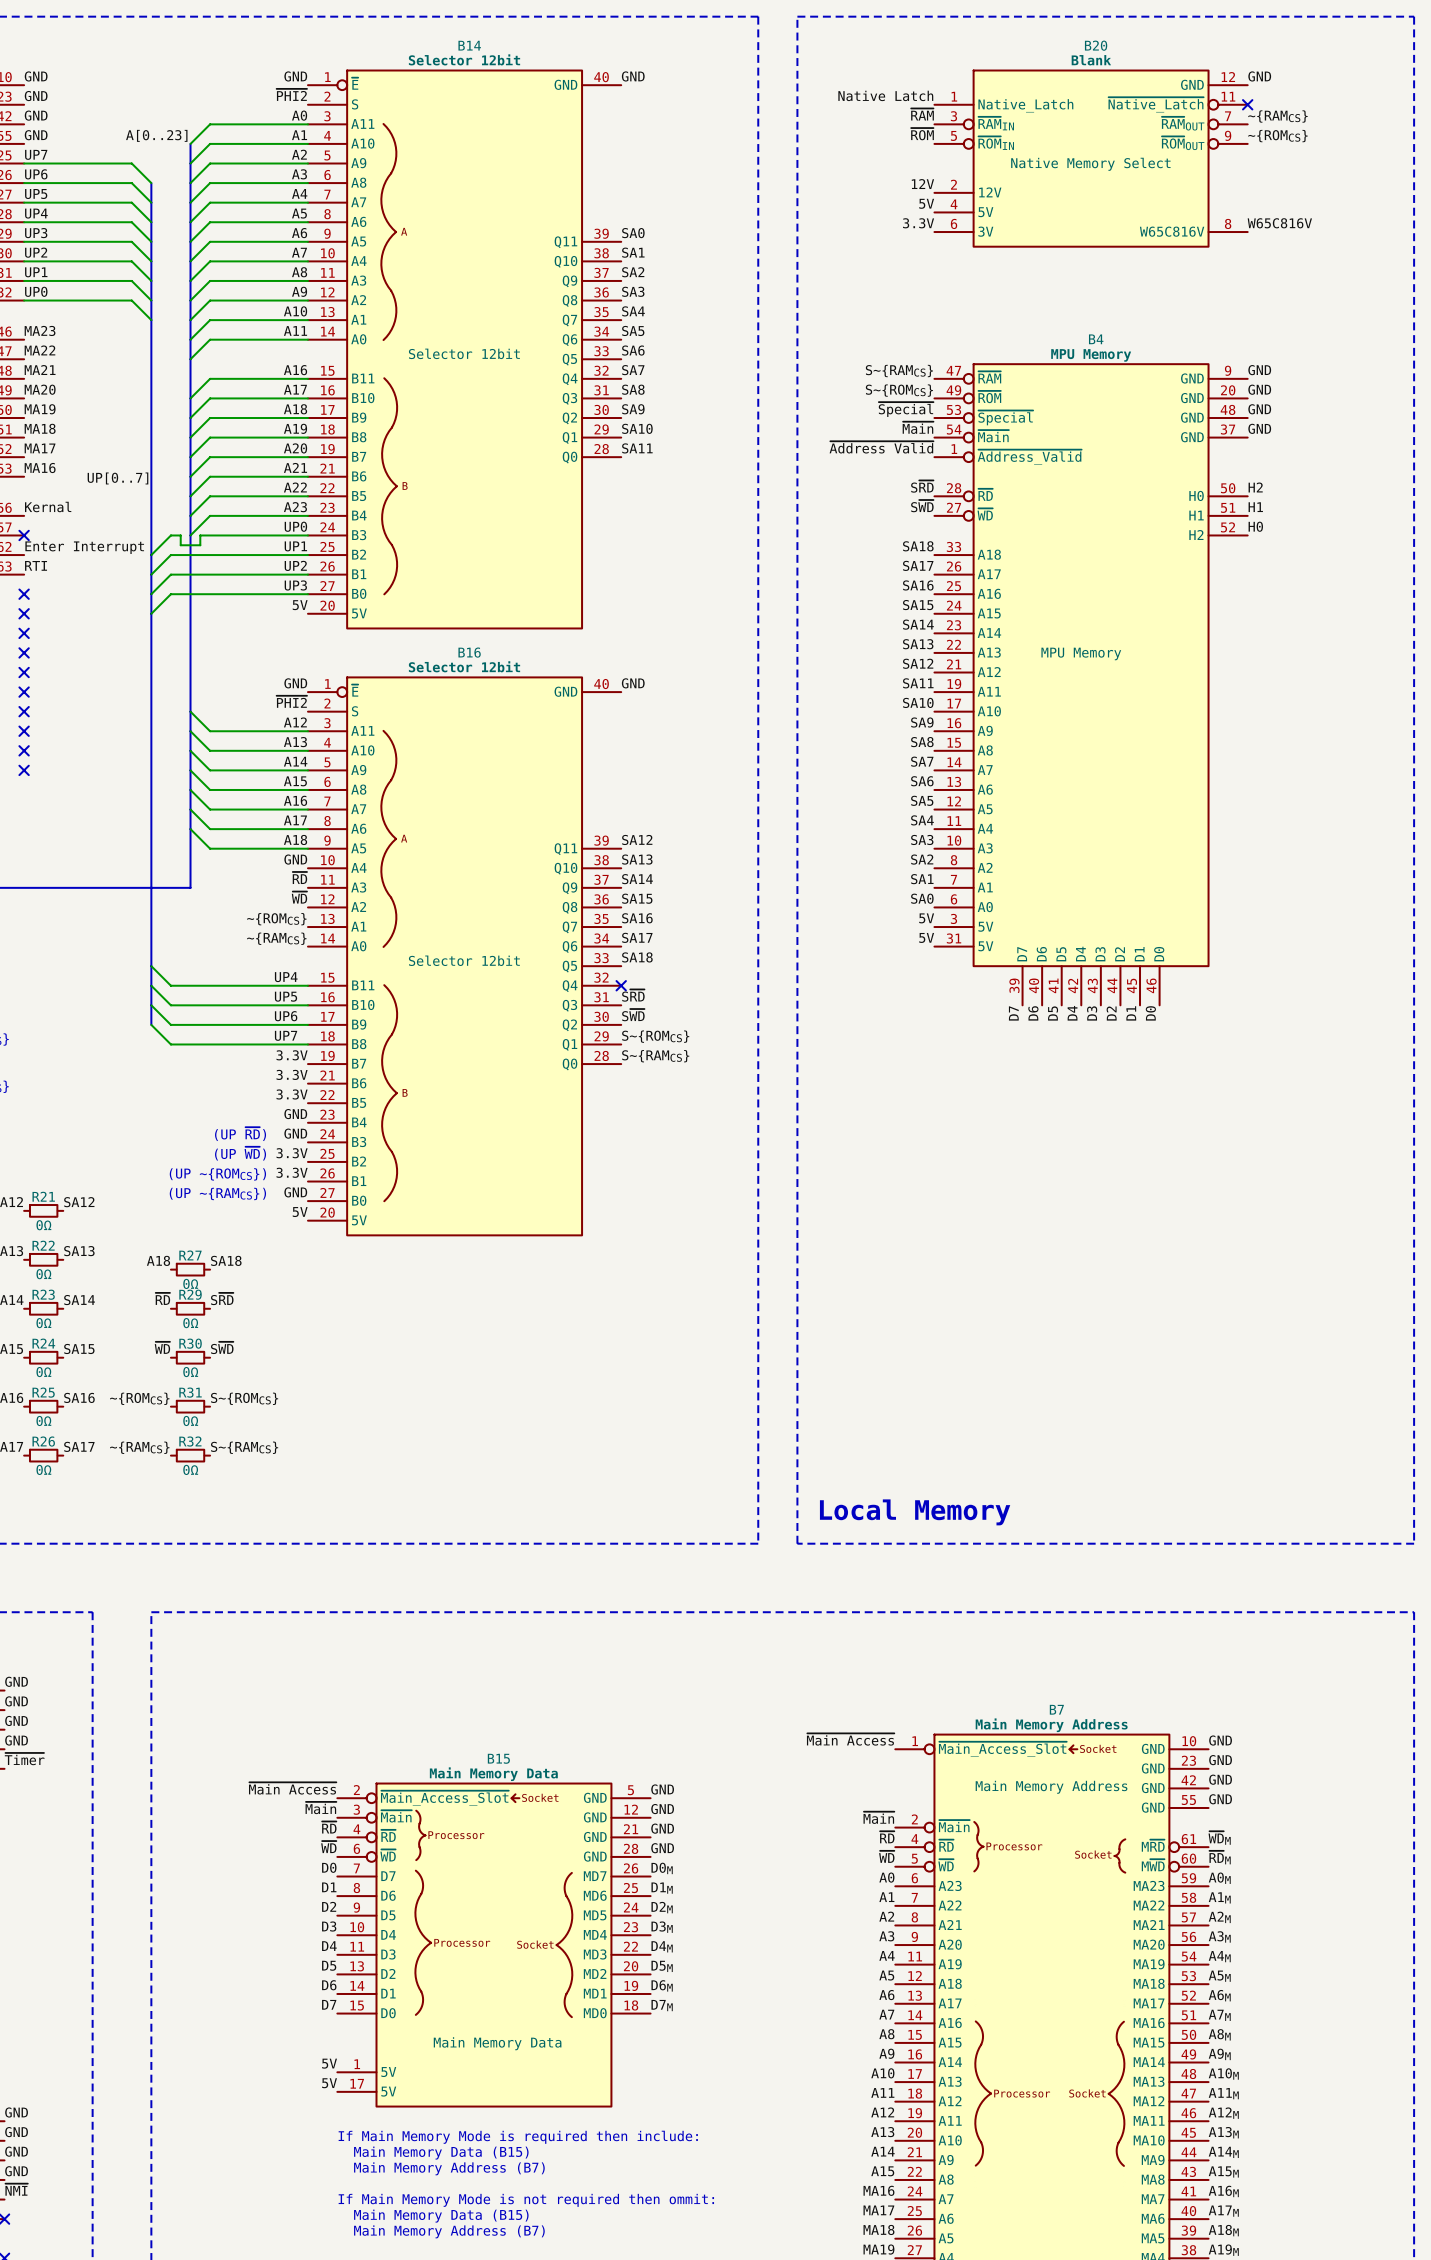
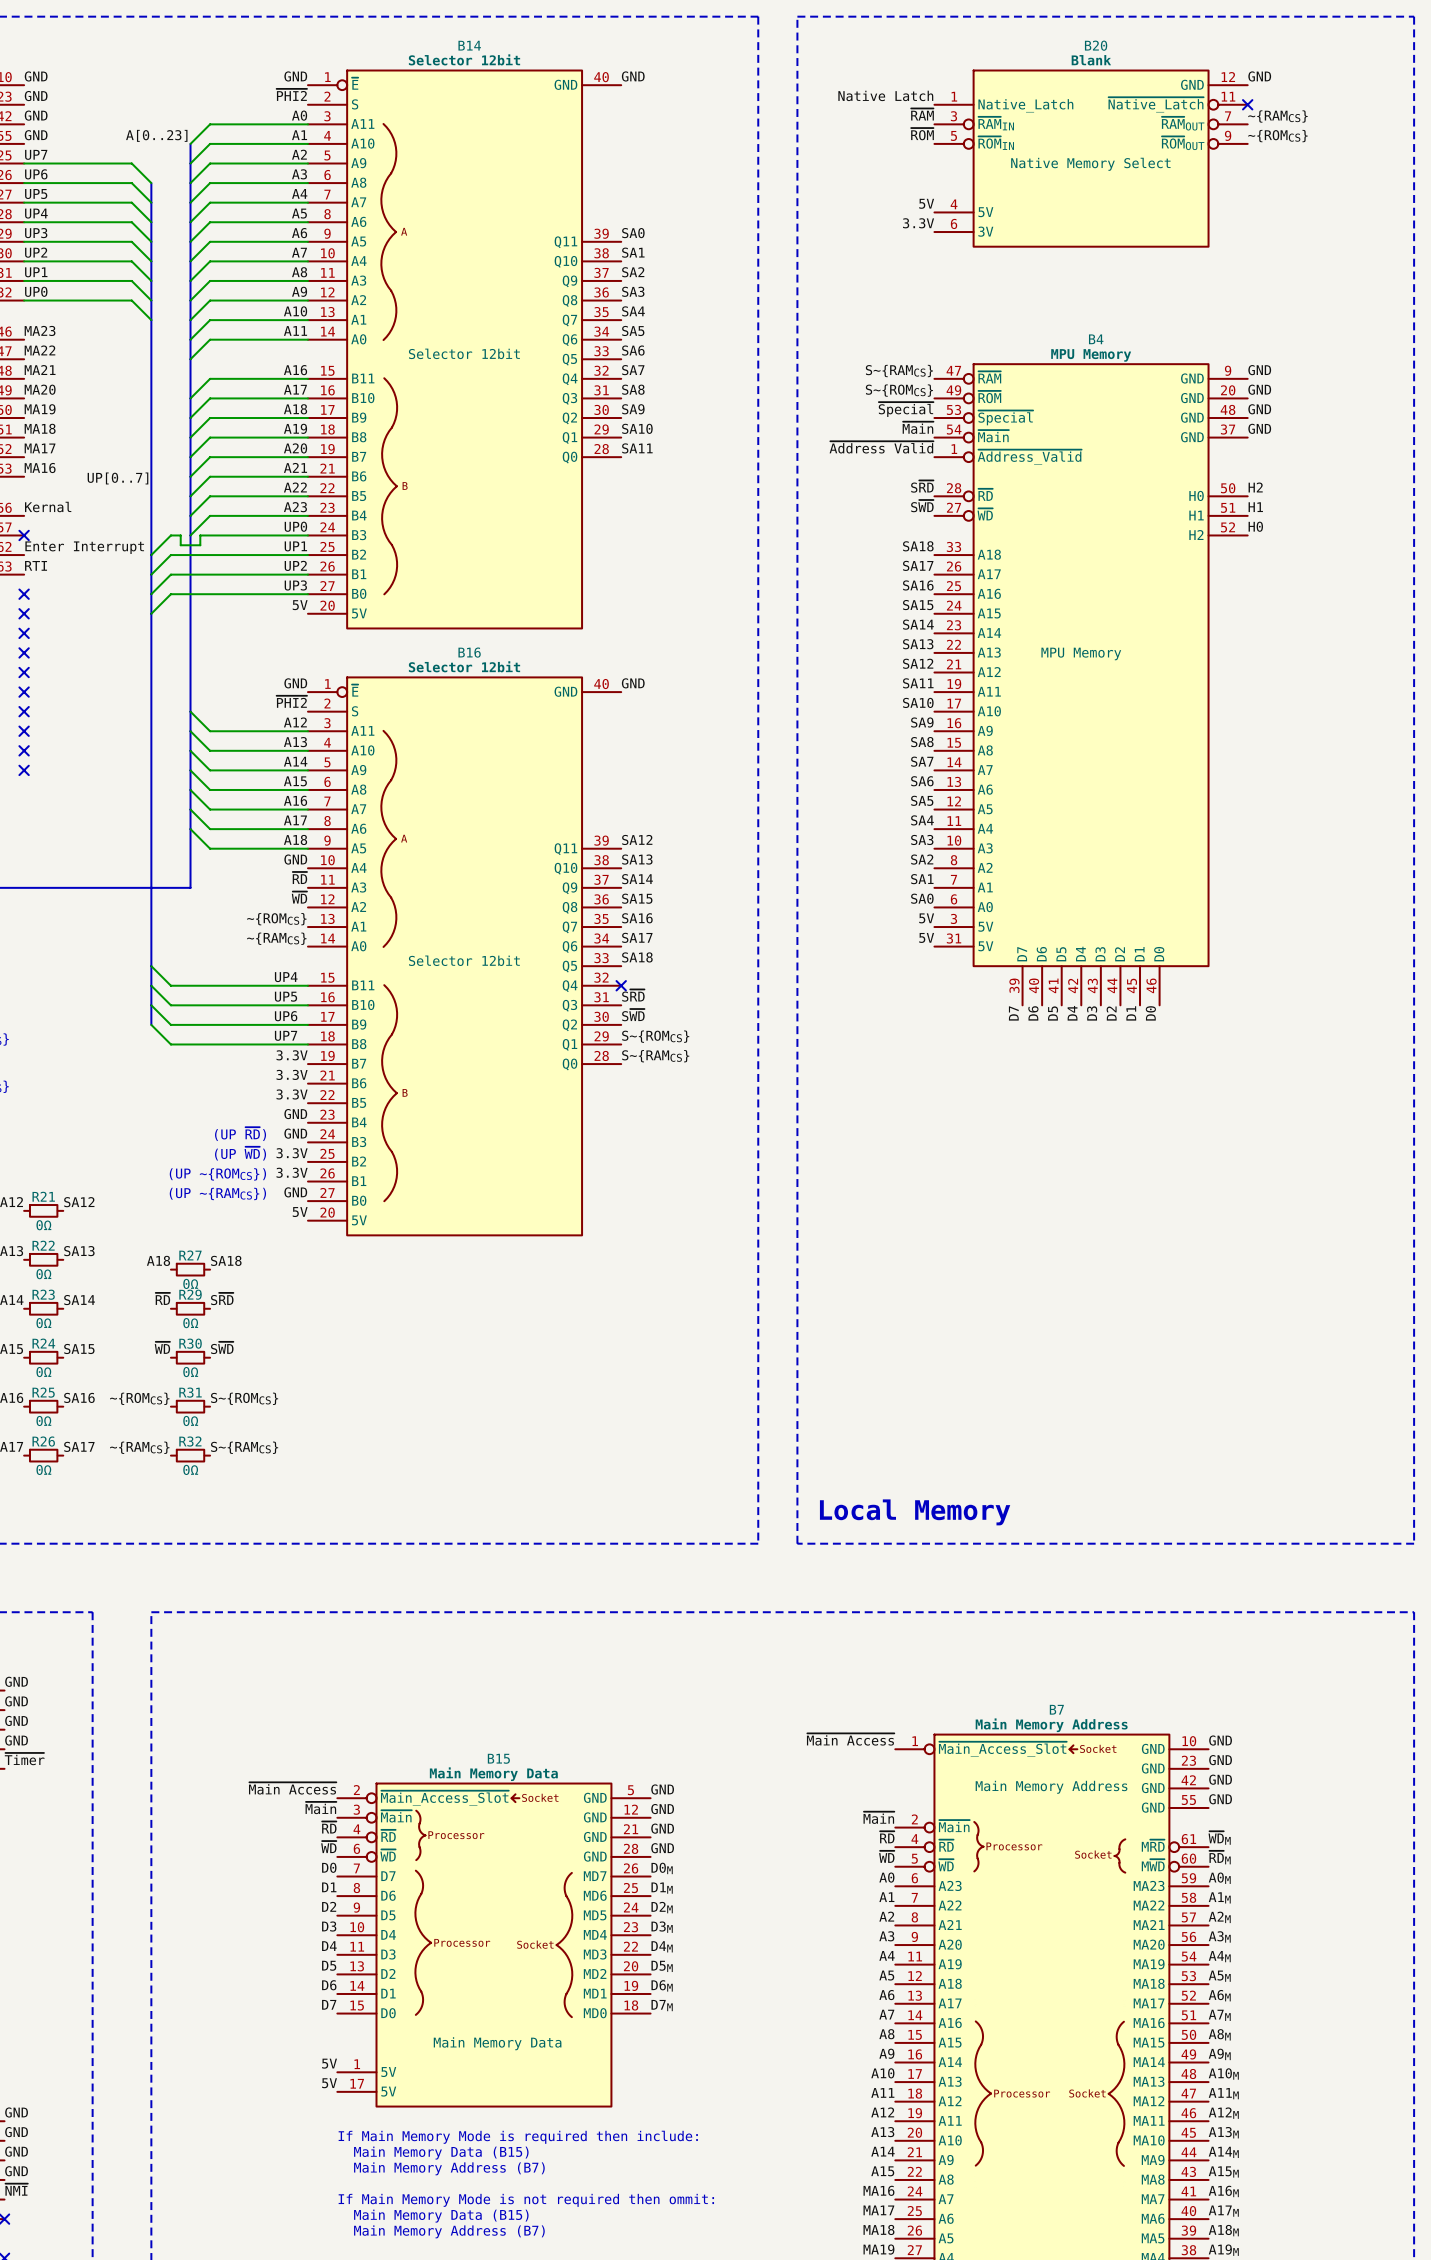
B20 symbol: [934, 69, 1248, 248] -> [934, 69, 1248, 248]
label: 12V (922, 184) -> none
label: W65C816V (1279, 223) -> none

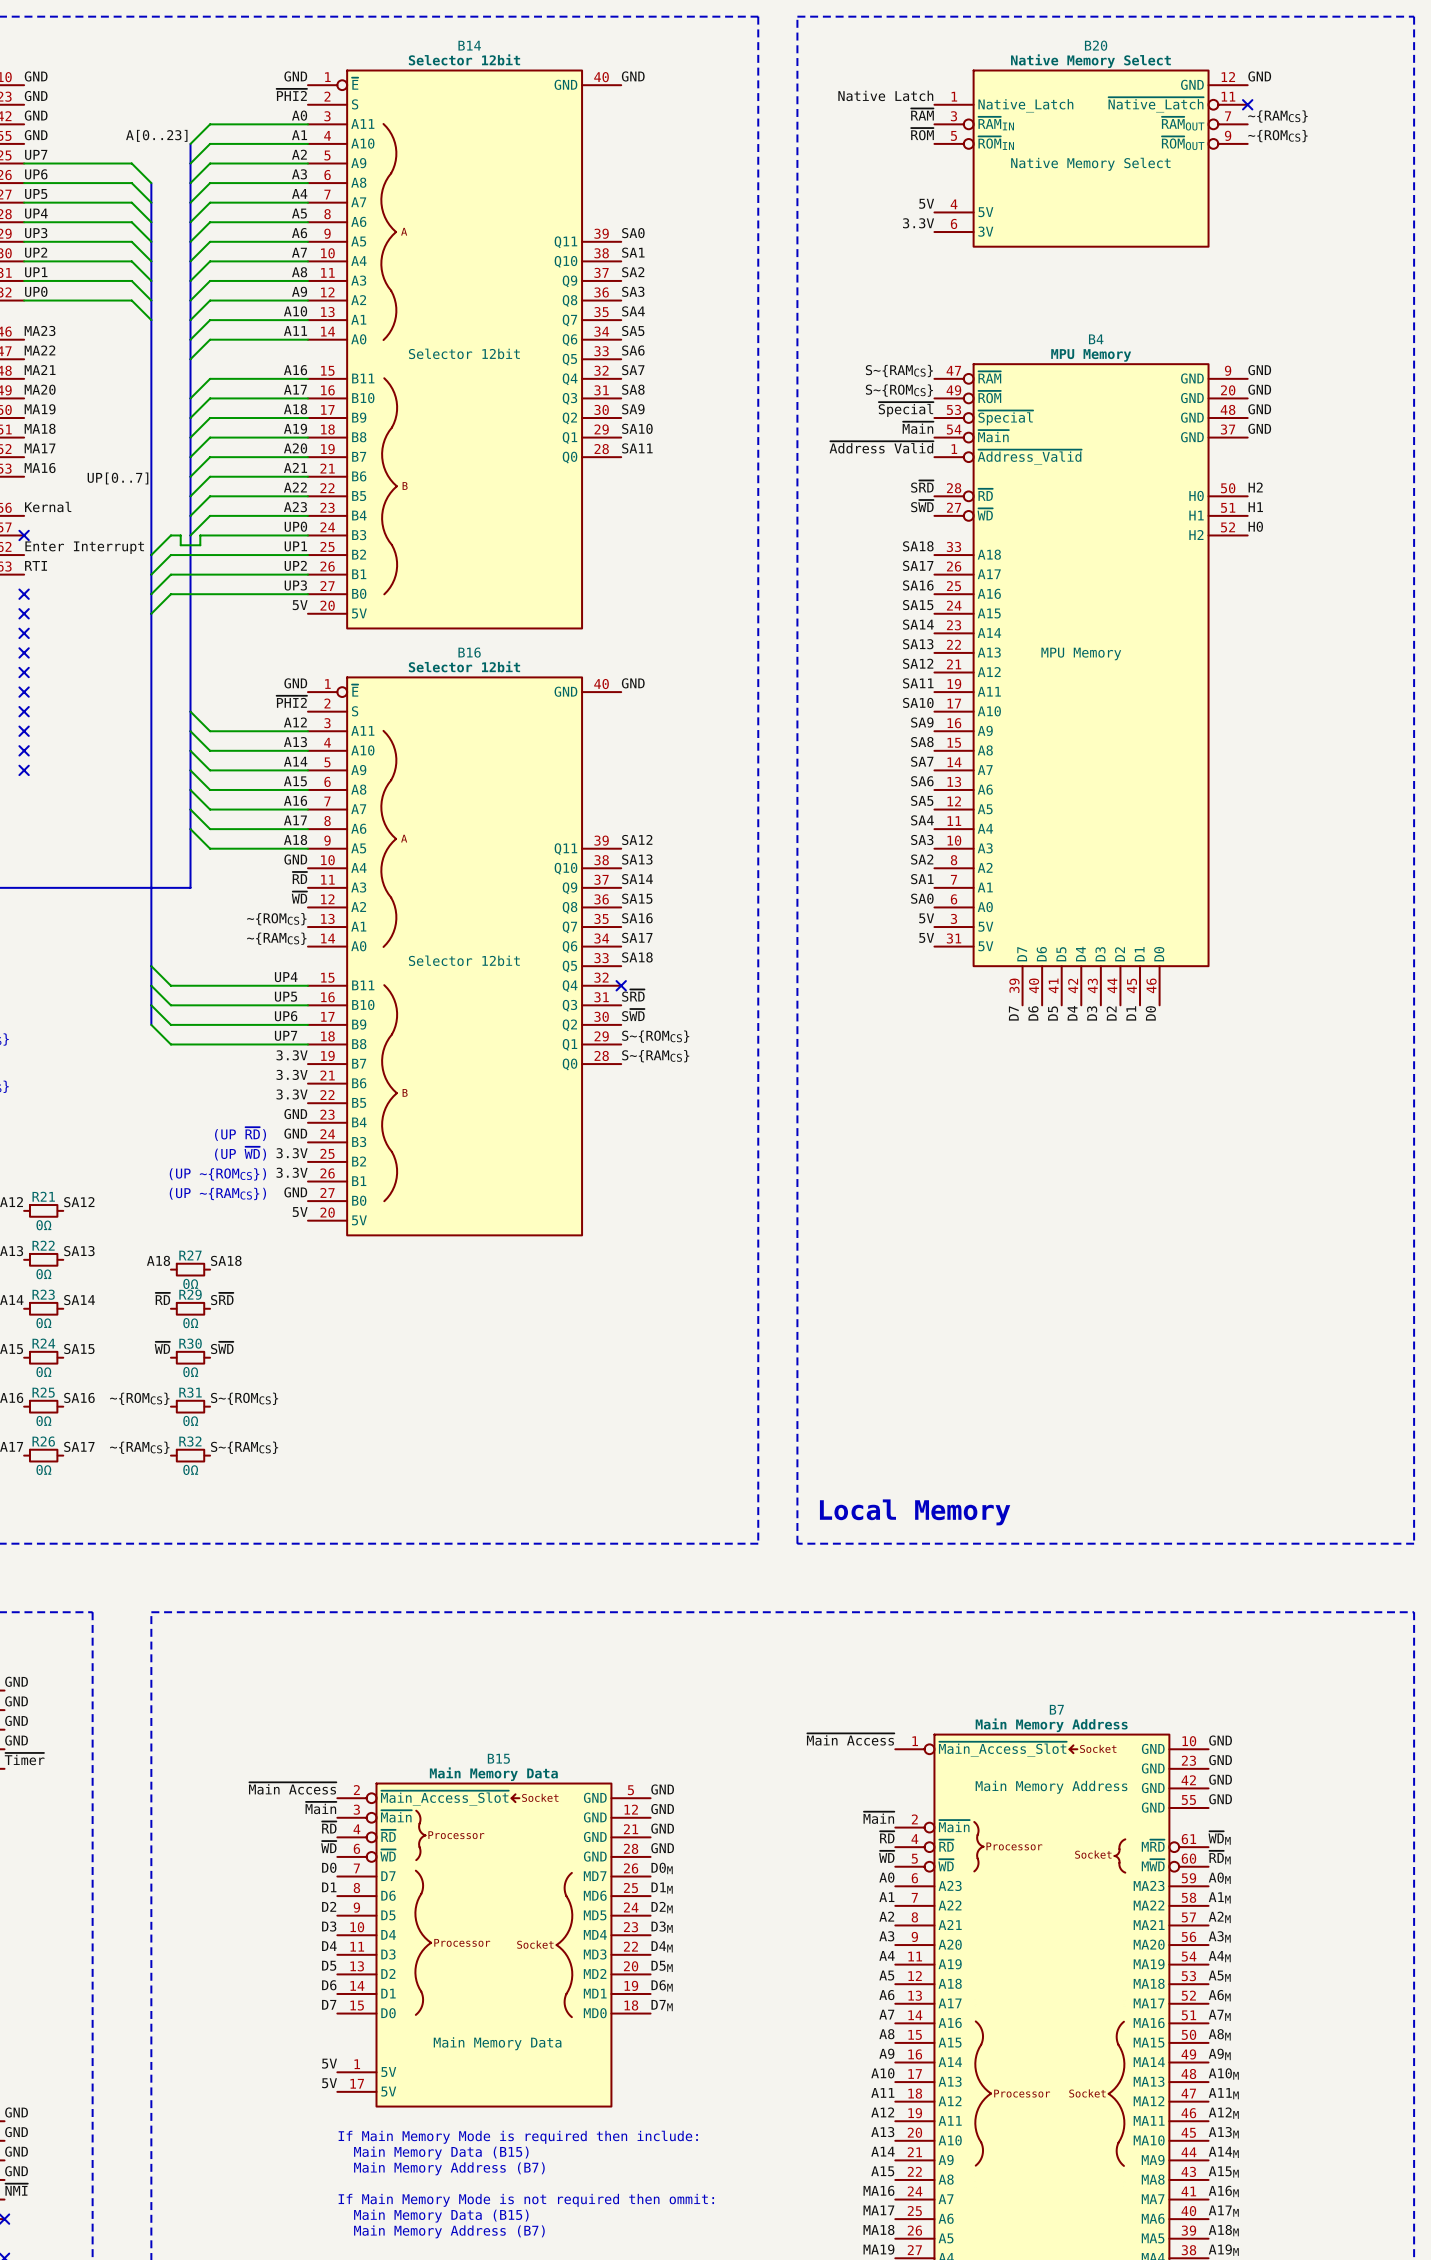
B20 value: Blank (1091, 60) -> Native Memory Select (1090, 61)

